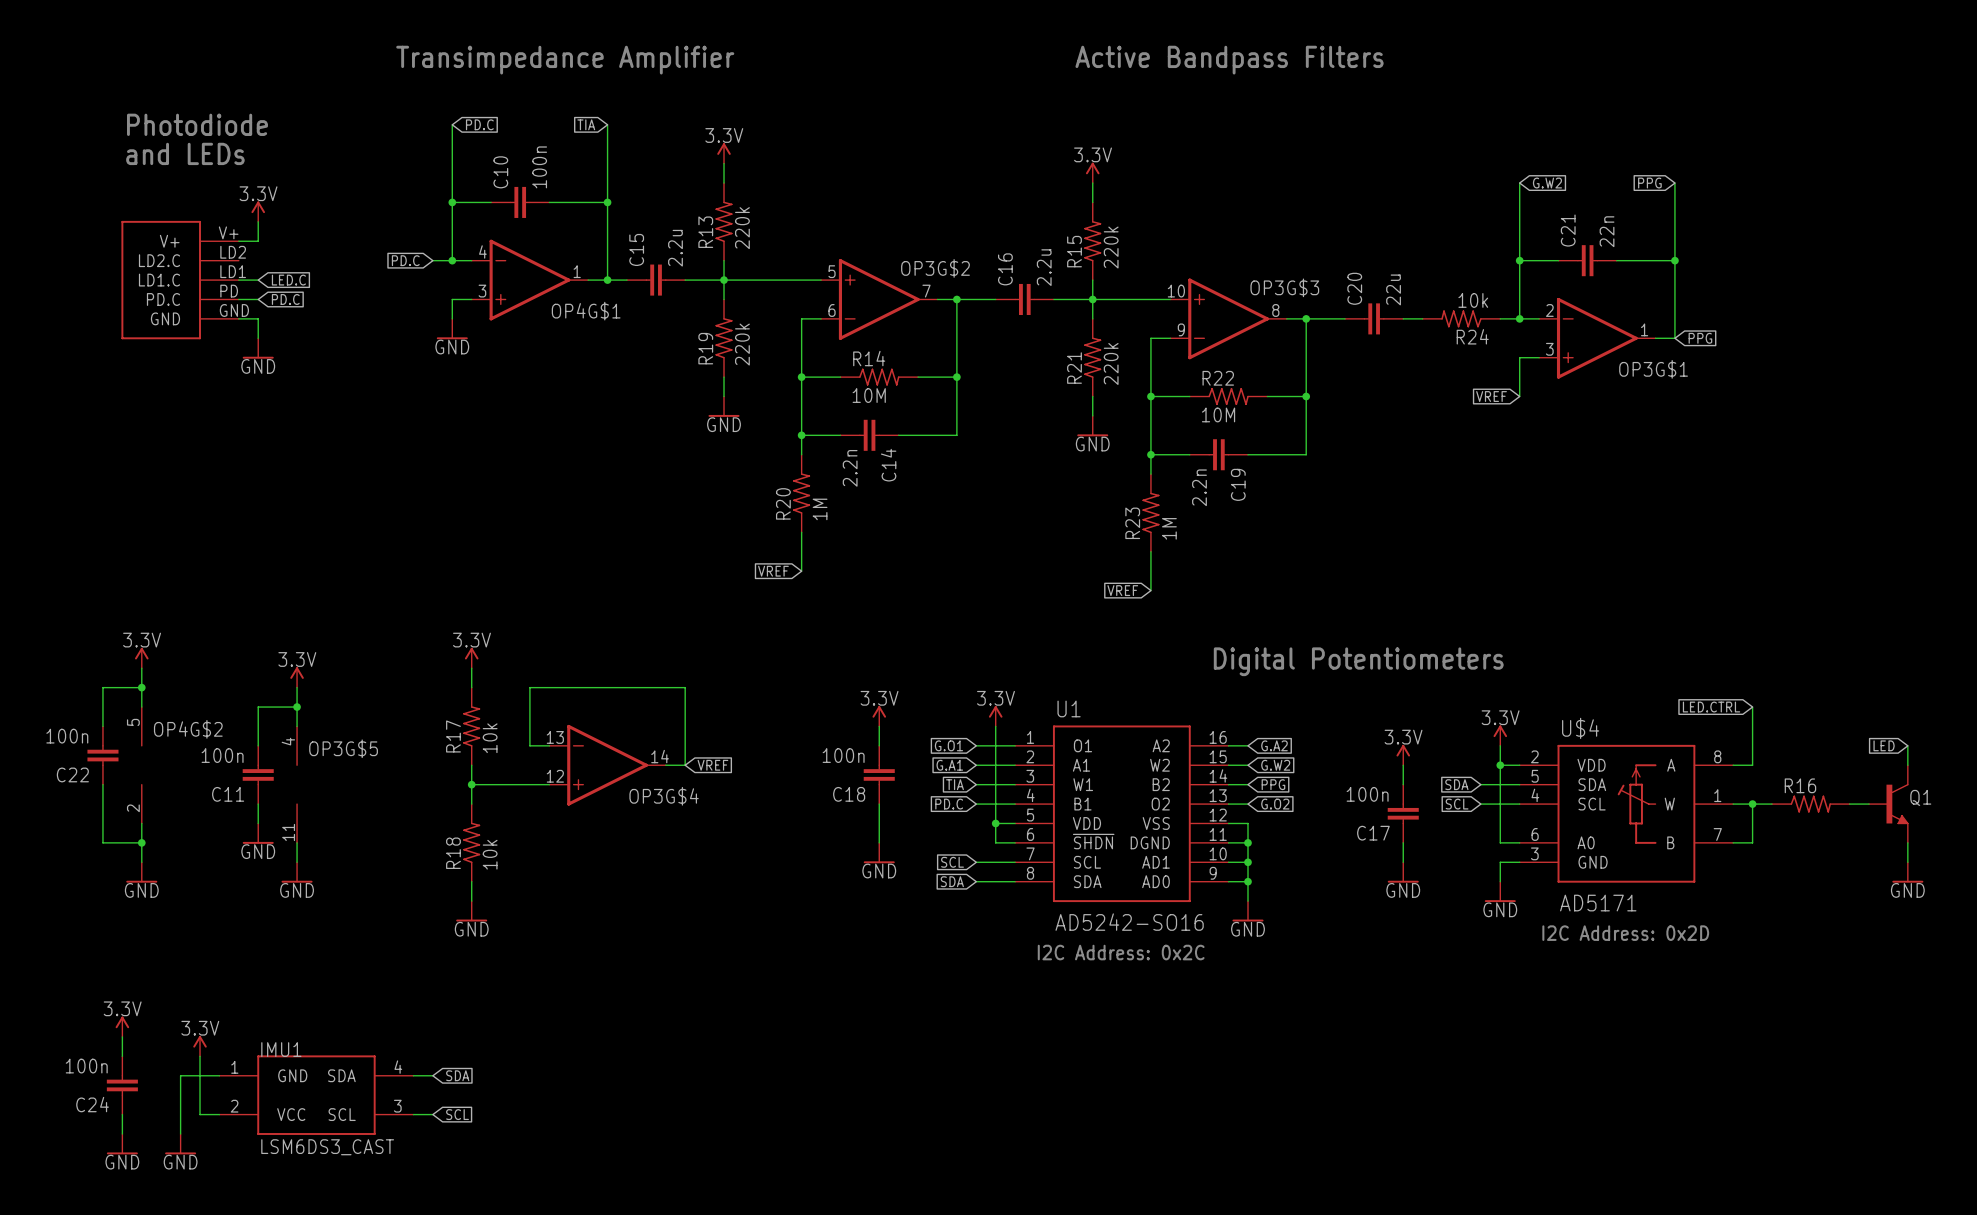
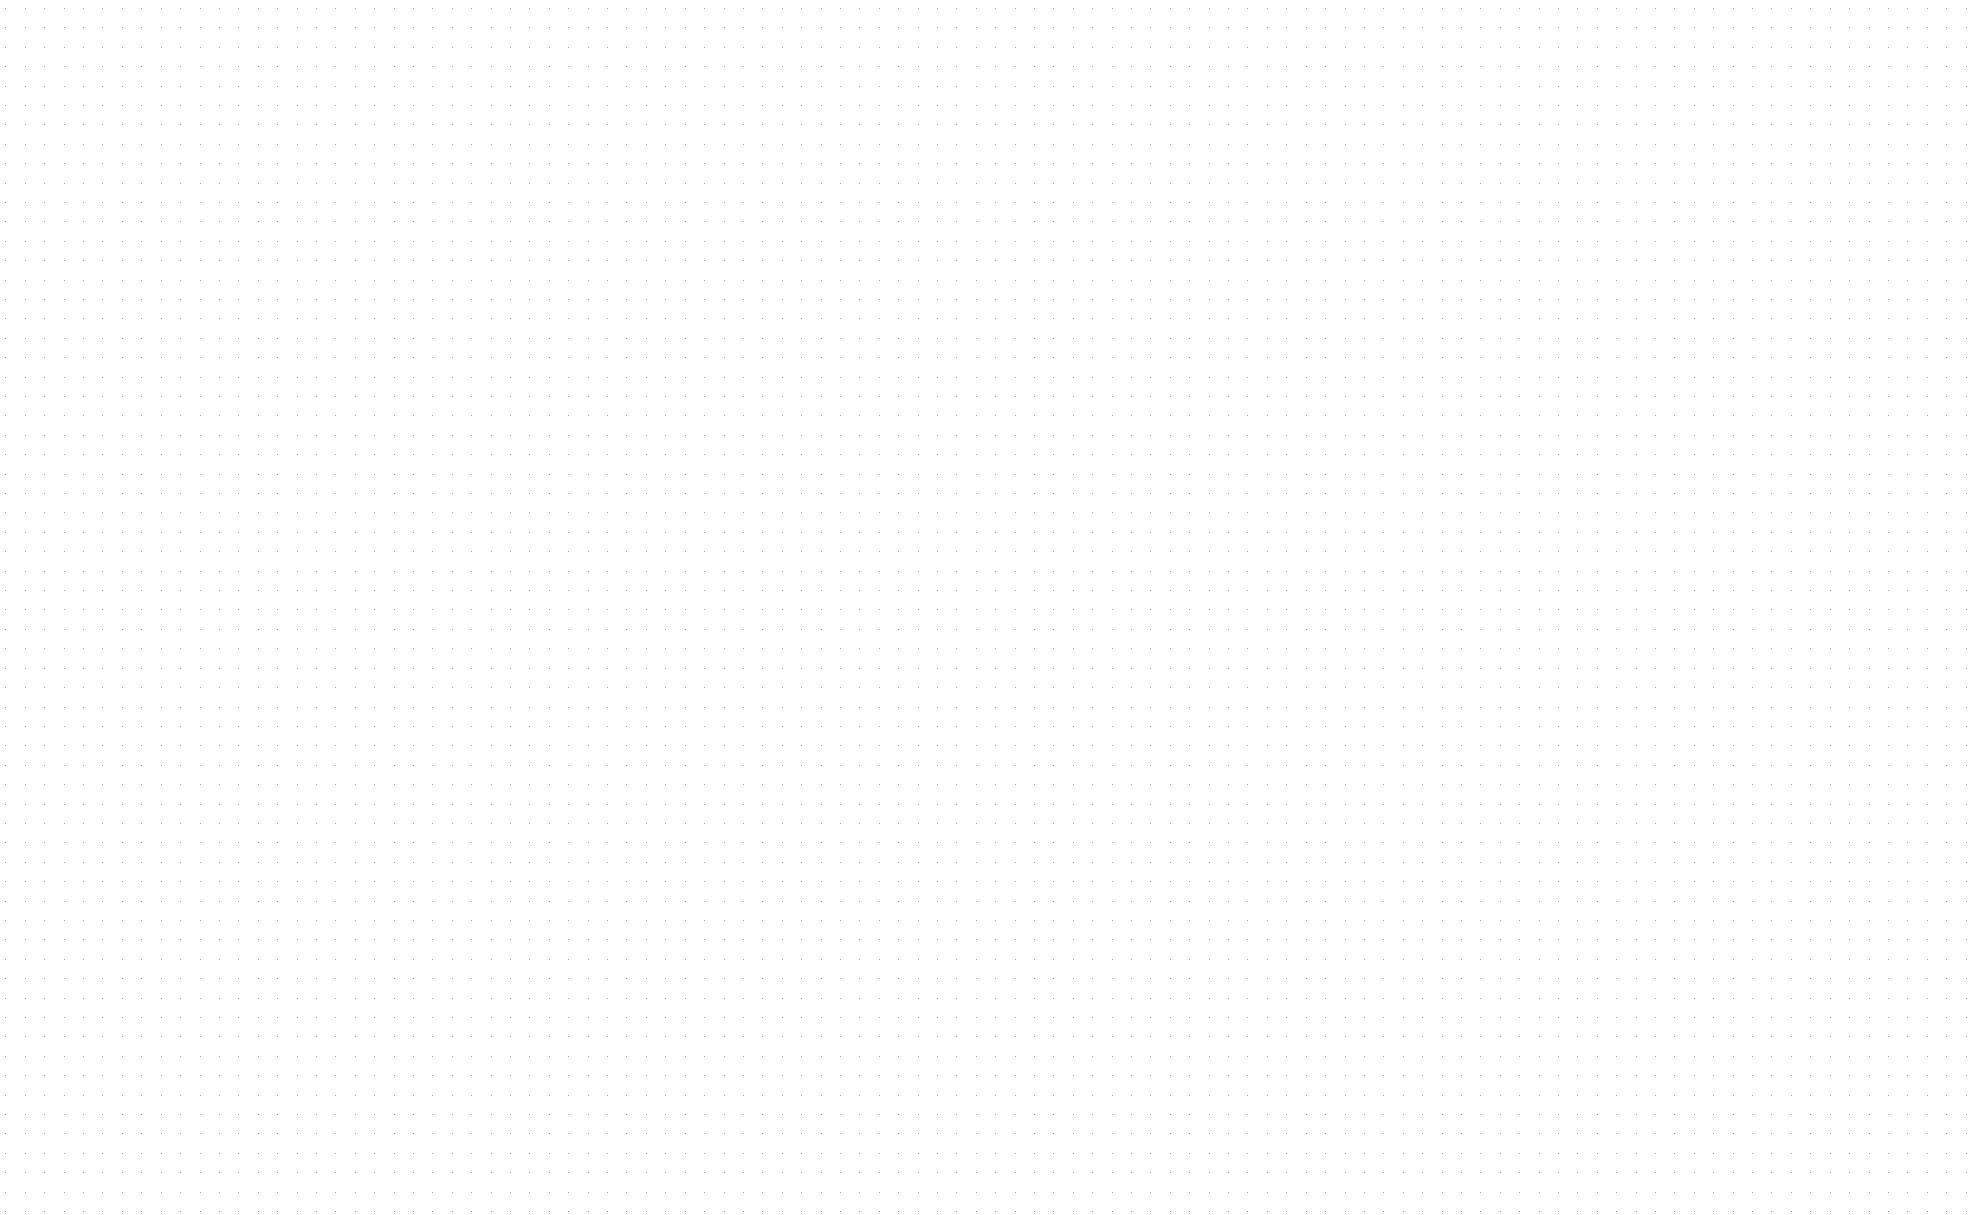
text: Transimpedance Amplifier (565, 60) -> none
text: Active Bandpass Filters (1229, 60) -> none
text: Photodiode (197, 124) -> none
wire: (452, 124) (452, 260) -> none
global label: PD.C (479, 124) -> none
global label: TIA (586, 124) -> none
wire: (607, 124) (607, 280) -> none
text: and LEDs (185, 153) -> none
power symbol: 3.3V (724, 153) -> none
wire: (724, 163) (724, 183) -> none
power symbol: 3.3V (1092, 172) -> none
wire: (1092, 183) (1092, 202) -> none
wire: (1519, 183) (1519, 318) -> none
global label: G.W2 (1547, 183) -> none
global label: PPG (1649, 183) -> none
wire: (1674, 183) (1674, 338) (1655, 338) -> none
wire: (452, 202) (491, 202) -> none
junction: (452, 202) -> none
C10: 100n (520, 202) -> none
wire: (549, 202) (607, 202) -> none
junction: (607, 202) -> none
power symbol: 3.3V (258, 211) -> none
wire: (258, 221) (258, 241) (238, 241) -> none
R13: 220k (724, 221) -> none
R15: 220k (1092, 241) -> none
global label: PD.C (405, 260) -> none
wire: (432, 260) (471, 260) -> none
junction: (452, 260) -> none
wire: (724, 260) (724, 299) -> none
wire: (1519, 260) (1558, 260) -> none
junction: (1519, 260) -> none
C21: 22n (1587, 260) -> none
wire: (1616, 260) (1674, 260) -> none
junction: (1674, 260) -> none
part: (180, 280) -> none
wire: (238, 280) (258, 280) -> none
global label: LED.C (288, 280) -> none
OP4G$1: (529, 280) -> none
wire: (588, 280) (626, 280) -> none
junction: (607, 280) -> none
C15: 2.2u (656, 280) -> none
wire: (685, 280) (821, 280) -> none
junction: (724, 280) -> none
wire: (1092, 280) (1092, 318) -> none
wire: (238, 299) (258, 299) -> none
global label: PD.C (285, 299) -> none
wire: (471, 299) (452, 299) (452, 318) -> none
OP3G$2: (879, 299) -> none
wire: (937, 299) (995, 299) -> none
wire: (956, 299) (956, 435) (898, 435) -> none
junction: (956, 299) -> none
C16: 2.2u (1024, 299) -> none
wire: (1053, 299) (1170, 299) -> none
junction: (1092, 299) -> none
wire: (238, 318) (258, 318) (258, 338) -> none
wire: (821, 318) (801, 318) (801, 454) -> none
OP3G$3: (1228, 318) -> none
wire: (1286, 318) (1345, 318) -> none
wire: (1306, 318) (1306, 454) (1247, 454) -> none
junction: (1306, 318) -> none
C20: 22u (1374, 318) -> none
wire: (1403, 318) (1422, 318) -> none
R24: 10k (1461, 318) -> none
wire: (1500, 318) (1539, 318) -> none
junction: (1519, 318) -> none
power symbol: GND (452, 329) -> none
R19: 220k (724, 338) -> none
wire: (1170, 338) (1150, 338) (1150, 474) -> none
OP3G$1: (1597, 338) -> none
global label: PPG (1700, 338) -> none
power symbol: GND (258, 348) -> none
R21: 220k (1092, 357) -> none
wire: (1539, 357) (1519, 357) (1519, 396) -> none
wire: (724, 377) (724, 396) -> none
wire: (801, 377) (840, 377) -> none
junction: (801, 377) -> none
R14: 10M (879, 377) -> none
wire: (918, 377) (956, 377) -> none
junction: (956, 377) -> none
wire: (1092, 396) (1092, 415) -> none
wire: (1150, 396) (1189, 396) -> none
junction: (1150, 396) -> none
R22: 10M (1228, 396) -> none
wire: (1267, 396) (1306, 396) -> none
junction: (1306, 396) -> none
global label: VREF (1491, 396) -> none
power symbol: GND (724, 406) -> none
power symbol: GND (1092, 426) -> none
wire: (801, 435) (840, 435) -> none
junction: (801, 435) -> none
C14: 2.2n (869, 435) -> none
wire: (1150, 454) (1189, 454) -> none
junction: (1150, 454) -> none
C19: 2.2n (1218, 454) -> none
R20: 1M (801, 493) -> none
R23: 1M (1150, 512) -> none
wire: (801, 532) (801, 571) -> none
wire: (1150, 551) (1150, 590) -> none
global label: VREF (773, 571) -> none
global label: VREF (1122, 590) -> none
power symbol: 3.3V (141, 658) -> none
power symbol: 3.3V (471, 658) -> none
text: Digital Potentiometers (1358, 661) -> none
wire: (141, 668) (141, 707) -> none
wire: (471, 668) (471, 687) -> none
power symbol: 3.3V (297, 677) -> none
wire: (141, 687) (102, 687) (102, 726) -> none
junction: (141, 687) -> none
wire: (297, 687) (297, 726) -> none
wire: (297, 707) (258, 707) (258, 745) -> none
junction: (297, 707) -> none
global label: LED.CTRL (1711, 707) -> none
wire: (1752, 707) (1752, 765) (1733, 765) -> none
power symbol: 3.3V (879, 716) -> none
power symbol: 3.3V (995, 716) -> none
R17: 10k (471, 726) -> none
wire: (879, 726) (879, 745) -> none
wire: (995, 726) (995, 842) (1015, 842) -> none
power symbol: 3.3V (1500, 735) -> none
wire: (549, 745) (529, 745) (529, 687) (685, 687) (685, 765) (665, 765) -> none
global label: G.O1 (948, 745) -> none
wire: (976, 745) (1015, 745) -> none
wire: (1228, 745) (1247, 745) -> none
global label: G.A2 (1274, 745) -> none
wire: (1500, 745) (1500, 842) (1519, 842) -> none
global label: LED (1884, 745) -> none
wire: (1907, 745) (1907, 765) -> none
C22: 100n (102, 755) -> none
power symbol: 3.3V (1403, 755) -> none
OP4G$2: (141, 765) -> none
wire: (471, 765) (471, 804) -> none
OP3G$4: (607, 765) -> none
global label: VREF (712, 765) -> none
global label: G.A1 (949, 765) -> none
wire: (976, 765) (1015, 765) -> none
wire: (1228, 765) (1247, 765) -> none
global label: G.W2 (1275, 765) -> none
wire: (1403, 765) (1403, 784) -> none
wire: (1500, 765) (1519, 765) -> none
junction: (1500, 765) -> none
C11: 100n (258, 774) -> none
C18: 100n (879, 774) -> none
wire: (102, 784) (102, 842) (141, 842) -> none
OP3G$5: (297, 784) -> none
wire: (471, 784) (549, 784) -> none
junction: (471, 784) -> none
global label: TIA (954, 784) -> none
wire: (976, 784) (1015, 784) -> none
wire: (1228, 784) (1247, 784) -> none
global label: PPG (1273, 784) -> none
global label: SDA (1456, 784) -> none
wire: (1480, 784) (1519, 784) -> none
wire: (258, 804) (258, 823) -> none
wire: (879, 804) (879, 842) -> none
global label: PD.C (949, 804) -> none
wire: (976, 804) (1015, 804) -> none
wire: (1228, 804) (1247, 804) -> none
global label: G.O2 (1275, 804) -> none
global label: SCL (1457, 804) -> none
wire: (1480, 804) (1519, 804) -> none
wire: (1733, 804) (1771, 804) -> none
wire: (1752, 804) (1752, 842) (1733, 842) -> none
junction: (1752, 804) -> none
R16: (1810, 804) -> none
wire: (1849, 804) (1869, 804) -> none
Q1: (1888, 804) -> none
U1: AD5242-SO16 (1121, 813) -> none
C17: 100n (1403, 813) -> none
U$4: AD5171 (1626, 813) -> none
wire: (141, 823) (141, 862) -> none
wire: (995, 823) (1015, 823) -> none
junction: (995, 823) -> none
wire: (1228, 823) (1247, 823) (1247, 901) -> none
power symbol: GND (258, 833) -> none
junction: (141, 842) -> none
wire: (297, 842) (297, 862) -> none
R18: 10k (471, 842) -> none
wire: (1228, 842) (1247, 842) -> none
junction: (1247, 842) -> none
wire: (1403, 842) (1403, 862) -> none
wire: (1907, 842) (1907, 862) -> none
power symbol: GND (879, 853) -> none
global label: SCL (952, 862) -> none
wire: (976, 862) (1015, 862) -> none
wire: (1228, 862) (1247, 862) -> none
junction: (1247, 862) -> none
wire: (1519, 862) (1500, 862) (1500, 881) -> none
power symbol: GND (141, 872) -> none
power symbol: GND (297, 872) -> none
power symbol: GND (1403, 872) -> none
power symbol: GND (1907, 872) -> none
wire: (471, 881) (471, 901) -> none
global label: SDA (952, 881) -> none
wire: (976, 881) (1015, 881) -> none
wire: (1228, 881) (1247, 881) -> none
junction: (1247, 881) -> none
power symbol: GND (1500, 891) -> none
power symbol: GND (471, 911) -> none
power symbol: GND (1247, 911) -> none
text: I2C Address: 0x2D (1625, 933) -> none
text: I2C Address: 0x2C (1121, 952) -> none
power symbol: 3.3V (122, 1026) -> none
wire: (122, 1036) (122, 1056) -> none
power symbol: 3.3V (200, 1046) -> none
wire: (200, 1056) (200, 1114) (219, 1114) -> none
wire: (219, 1075) (180, 1075) (180, 1133) -> none
wire: (413, 1075) (432, 1075) -> none
global label: SDA (457, 1075) -> none
C24: 100n (122, 1085) -> none
IMU1: LSM6DS3_CAST (316, 1095) -> none
wire: (122, 1114) (122, 1133) -> none
wire: (413, 1114) (432, 1114) -> none
global label: SCL (457, 1114) -> none
power symbol: GND (122, 1144) -> none
power symbol: GND (180, 1144) -> none

